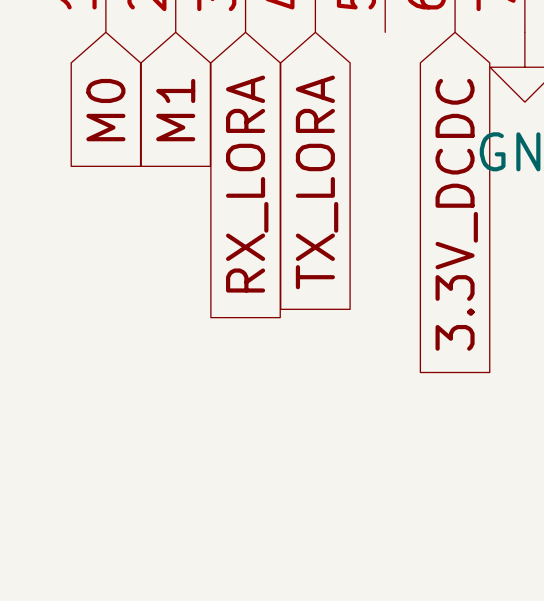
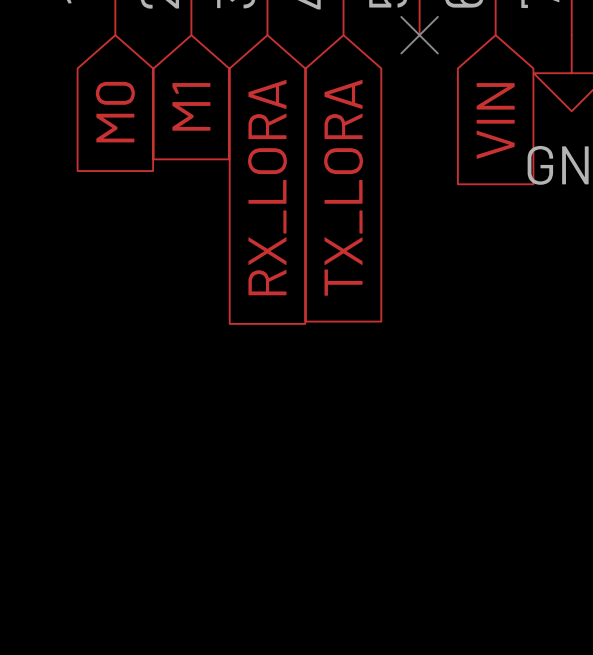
no-connect mark: none -> (419, 35)
global label: 3.3V_DCDC (456, 214) -> VIN (495, 120)

